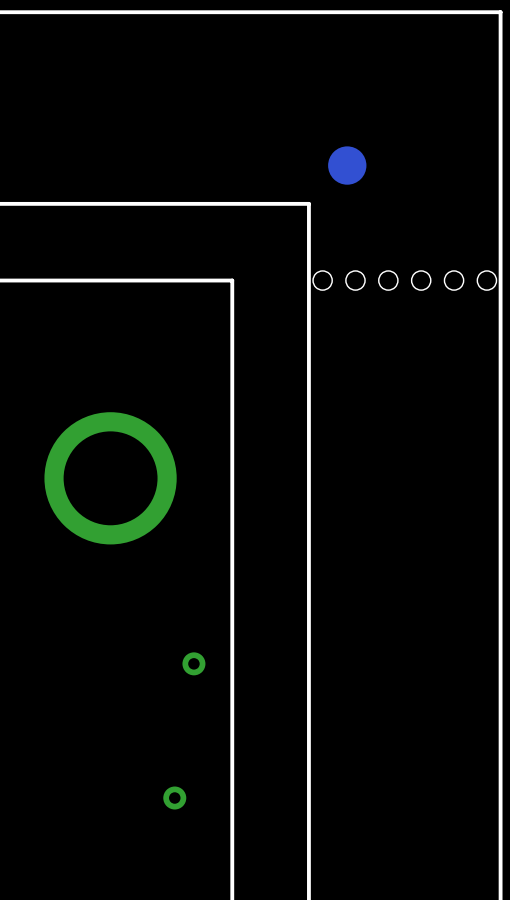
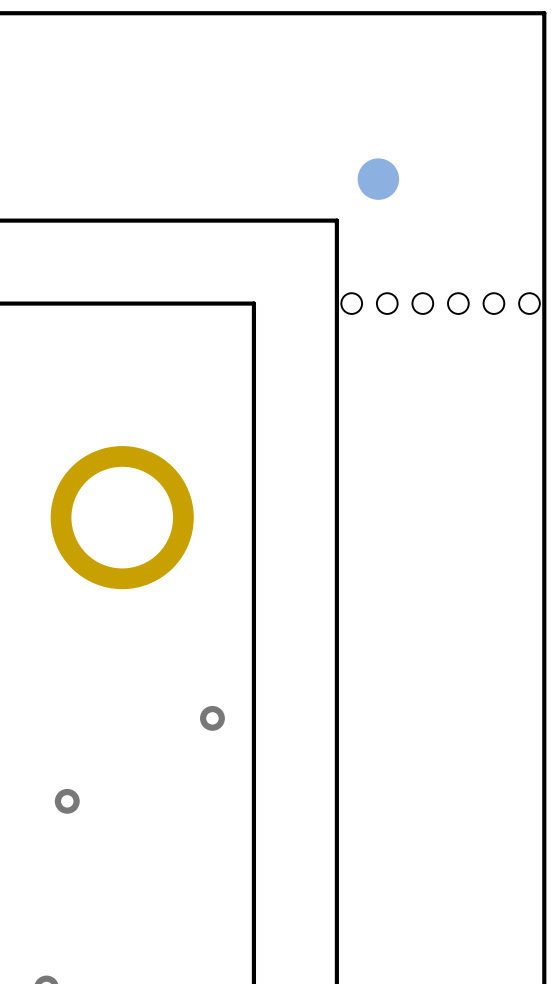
via position: (174, 798) -> (67, 801)

